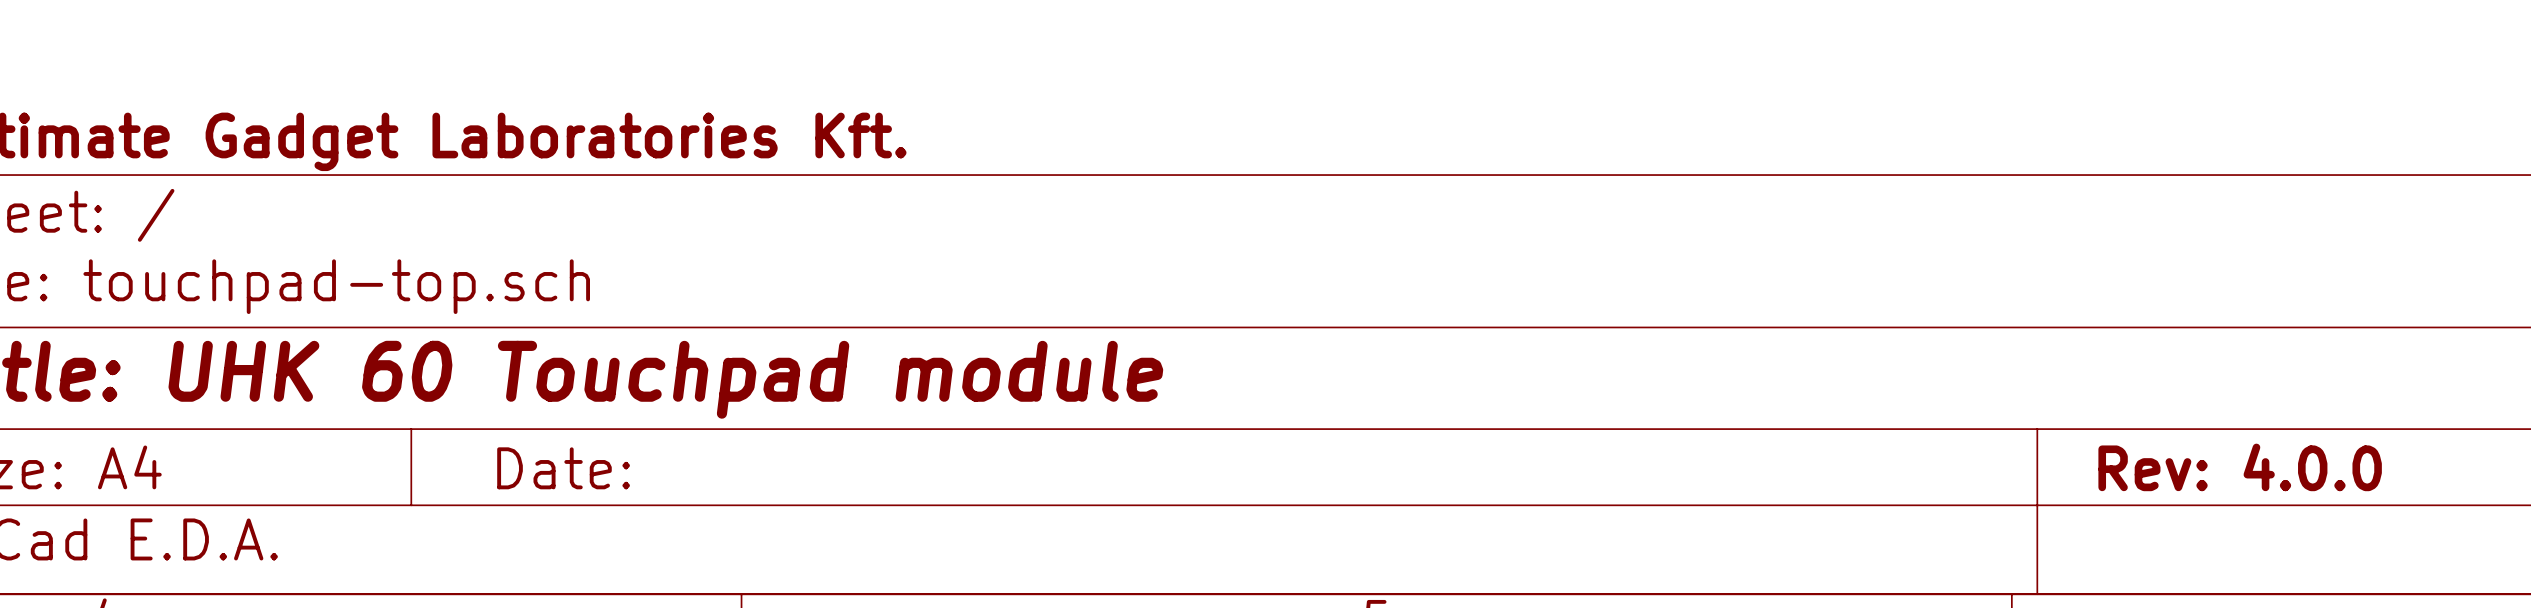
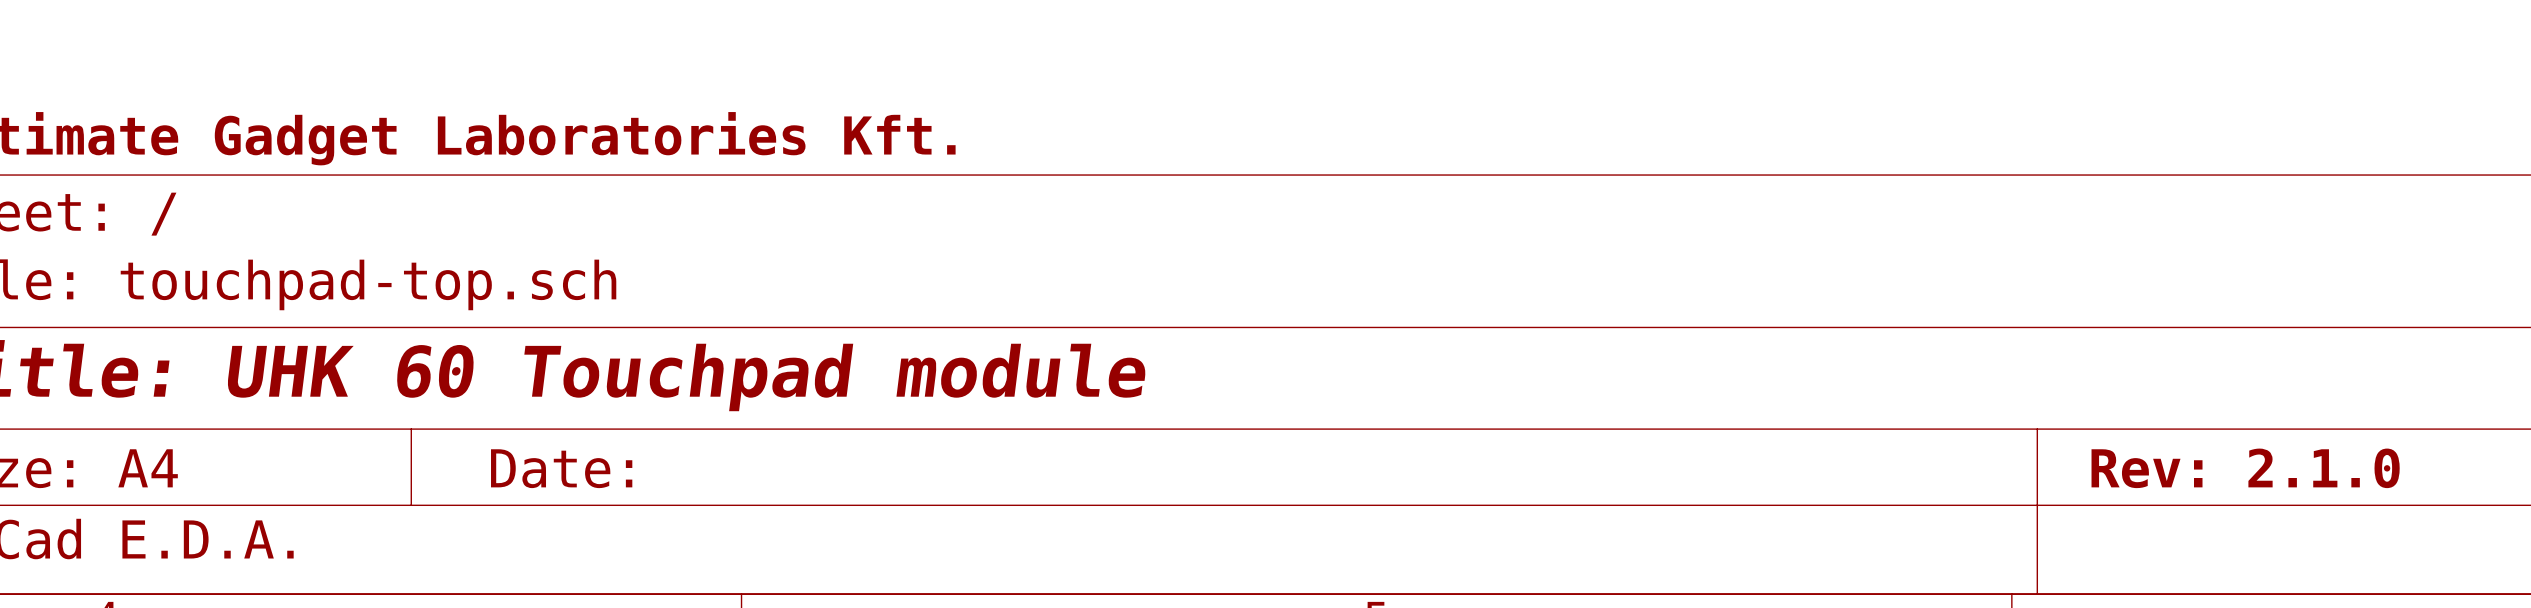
title block: Rev: 4.0.0 (2240, 467) -> Rev: 2.1.0 (2245, 468)

